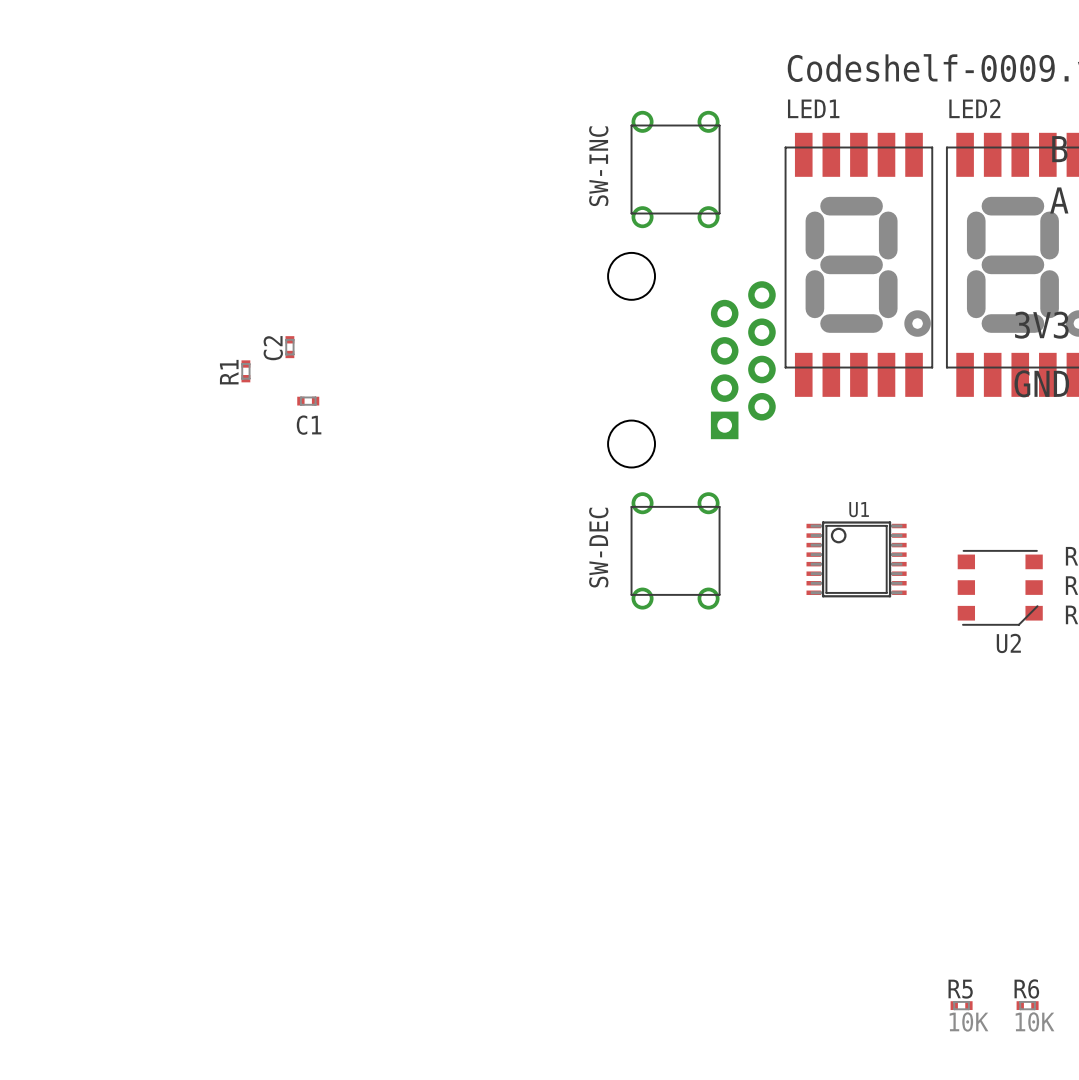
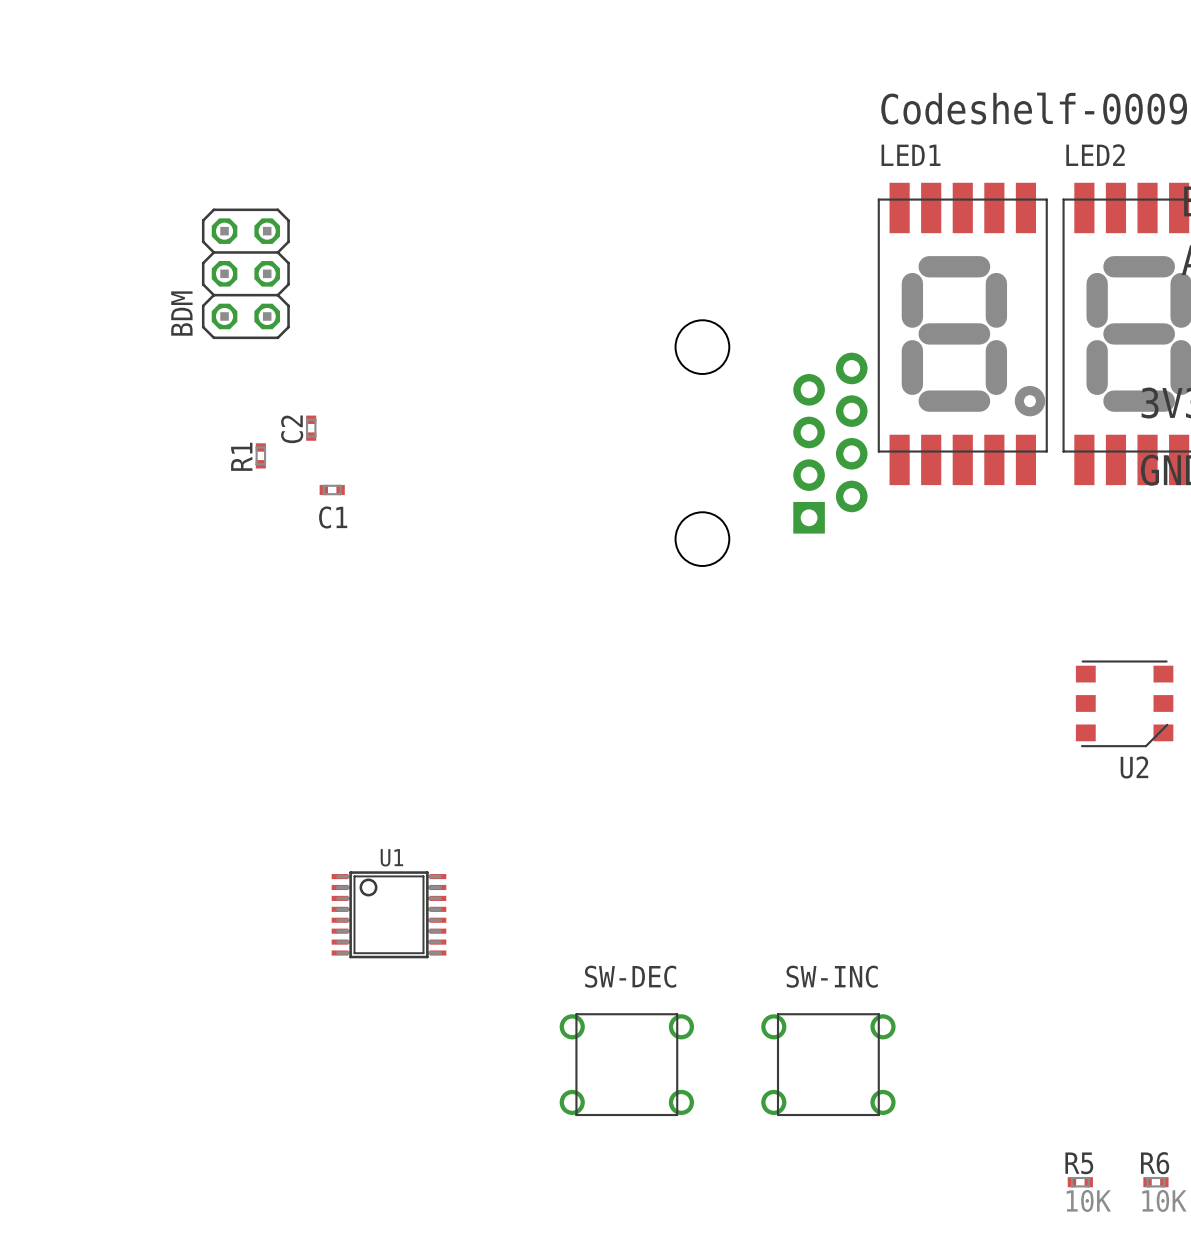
SW-INC: (675, 169) -> none
BDM: none -> (245, 273)
SW-DEC: (675, 550) -> none
U1 position: (856, 559) -> (388, 914)
SW-DEC: none -> (626, 1064)
SW-INC: none -> (828, 1064)

